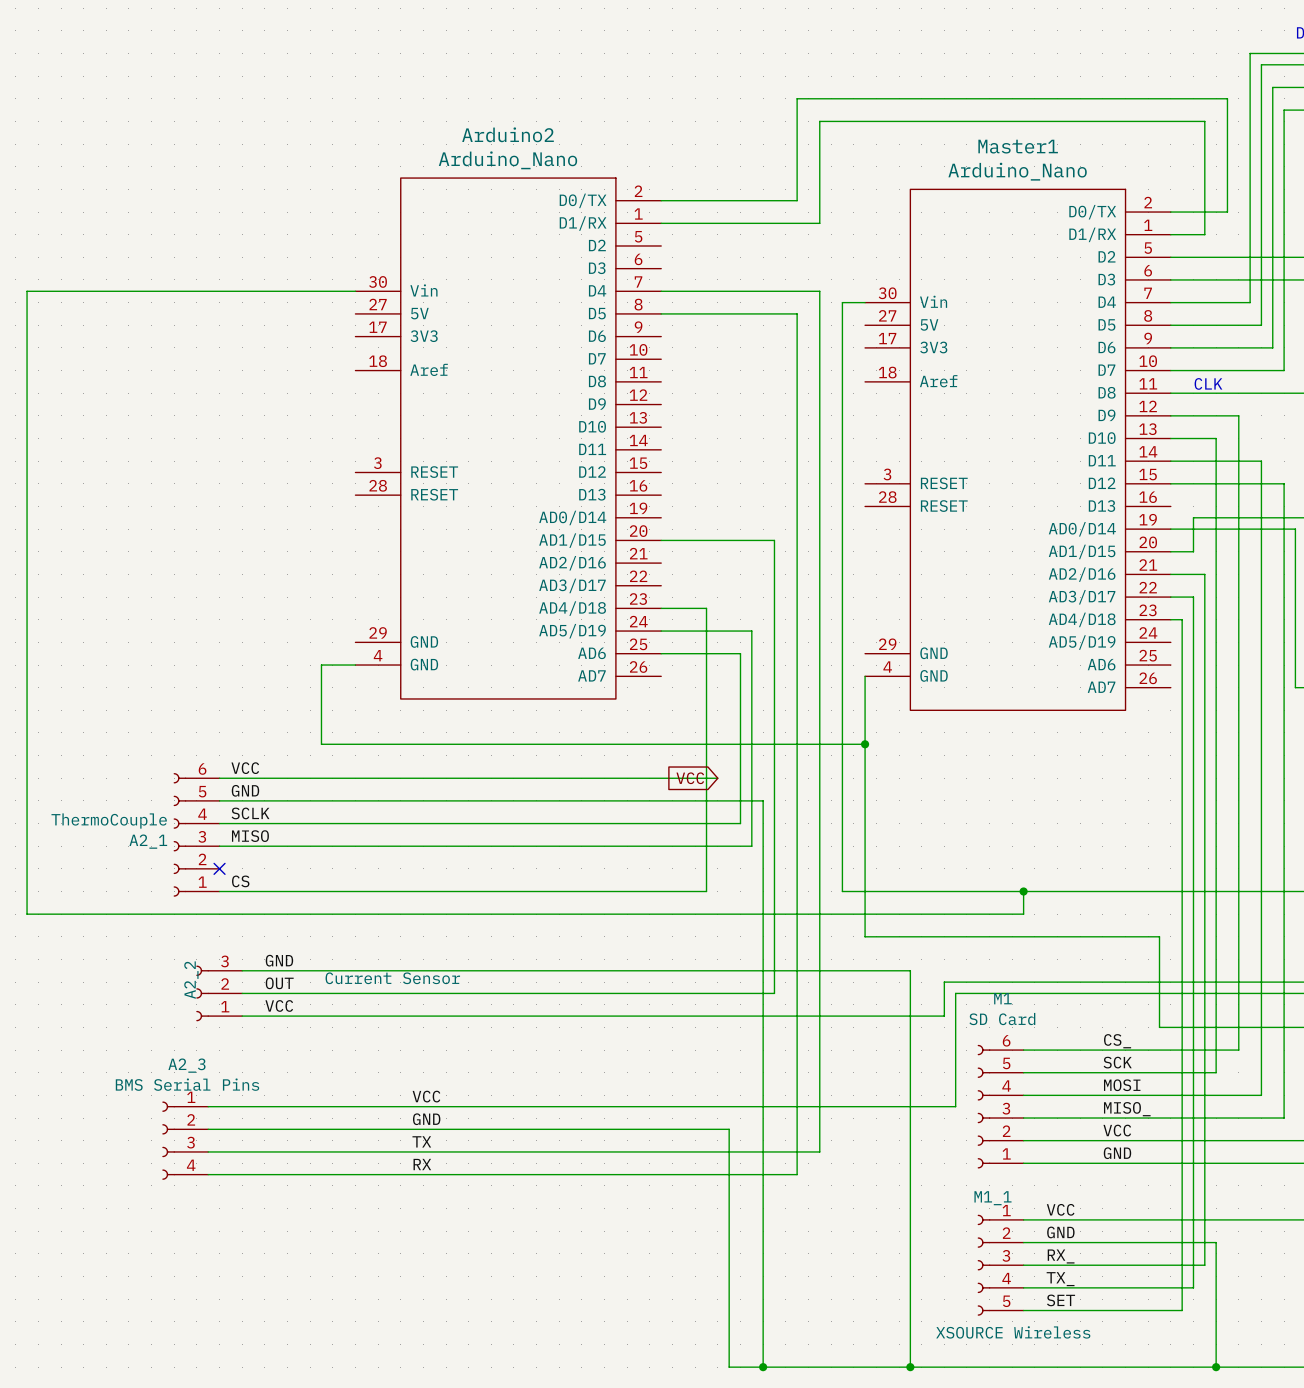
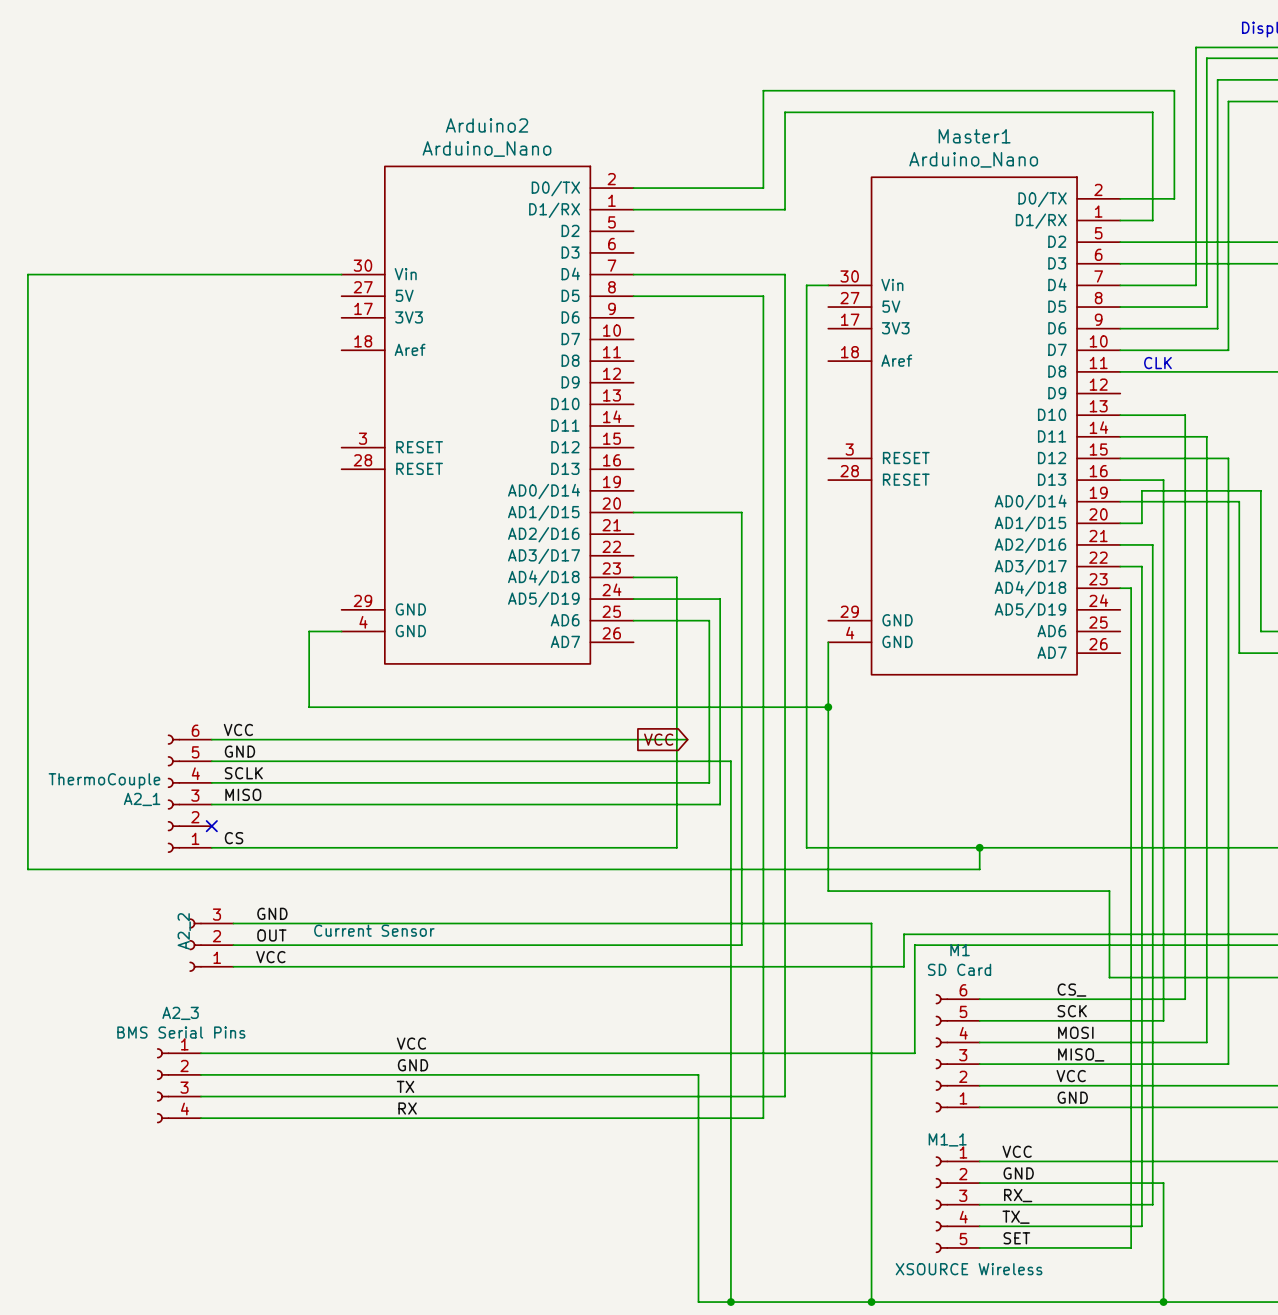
wire: (1170, 415) (1238, 415) (1238, 438) -> (1163, 415) (1185, 415)
wire: (1216, 438) (1216, 506) -> (1120, 480) (1163, 480)

